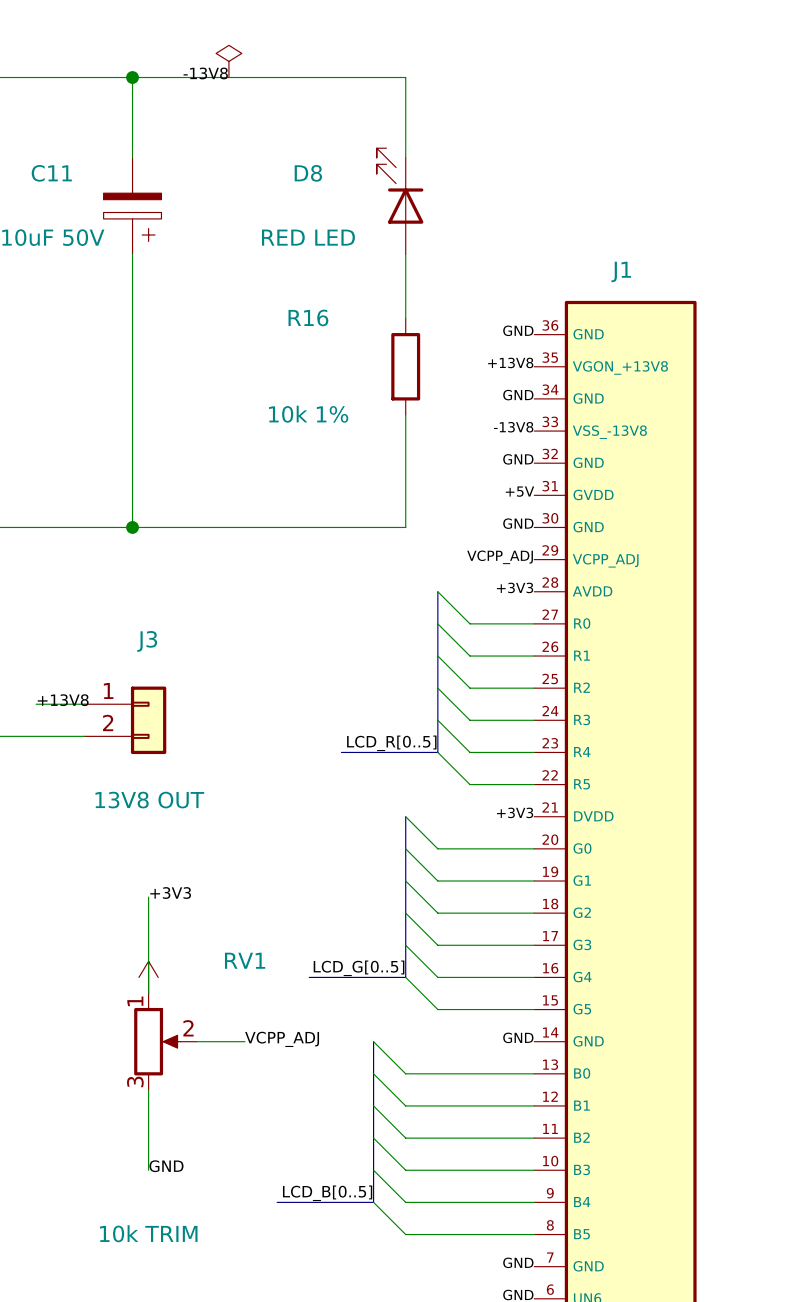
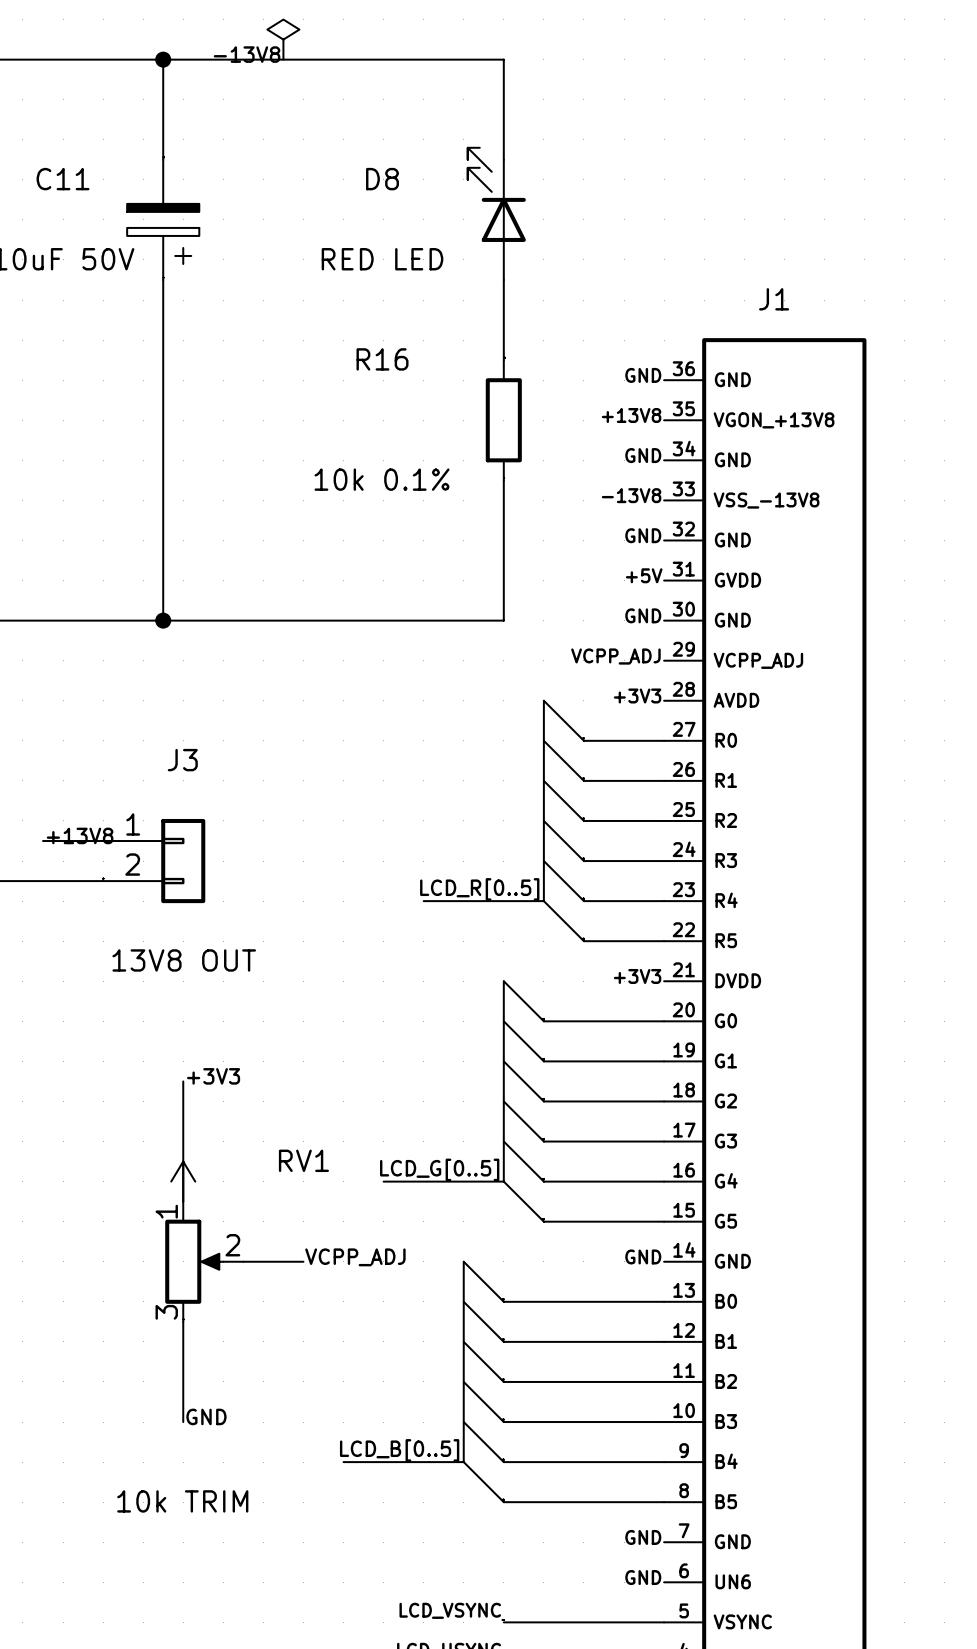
R16 value: 10k 1% (308, 414) -> 10k 0.1% (382, 479)

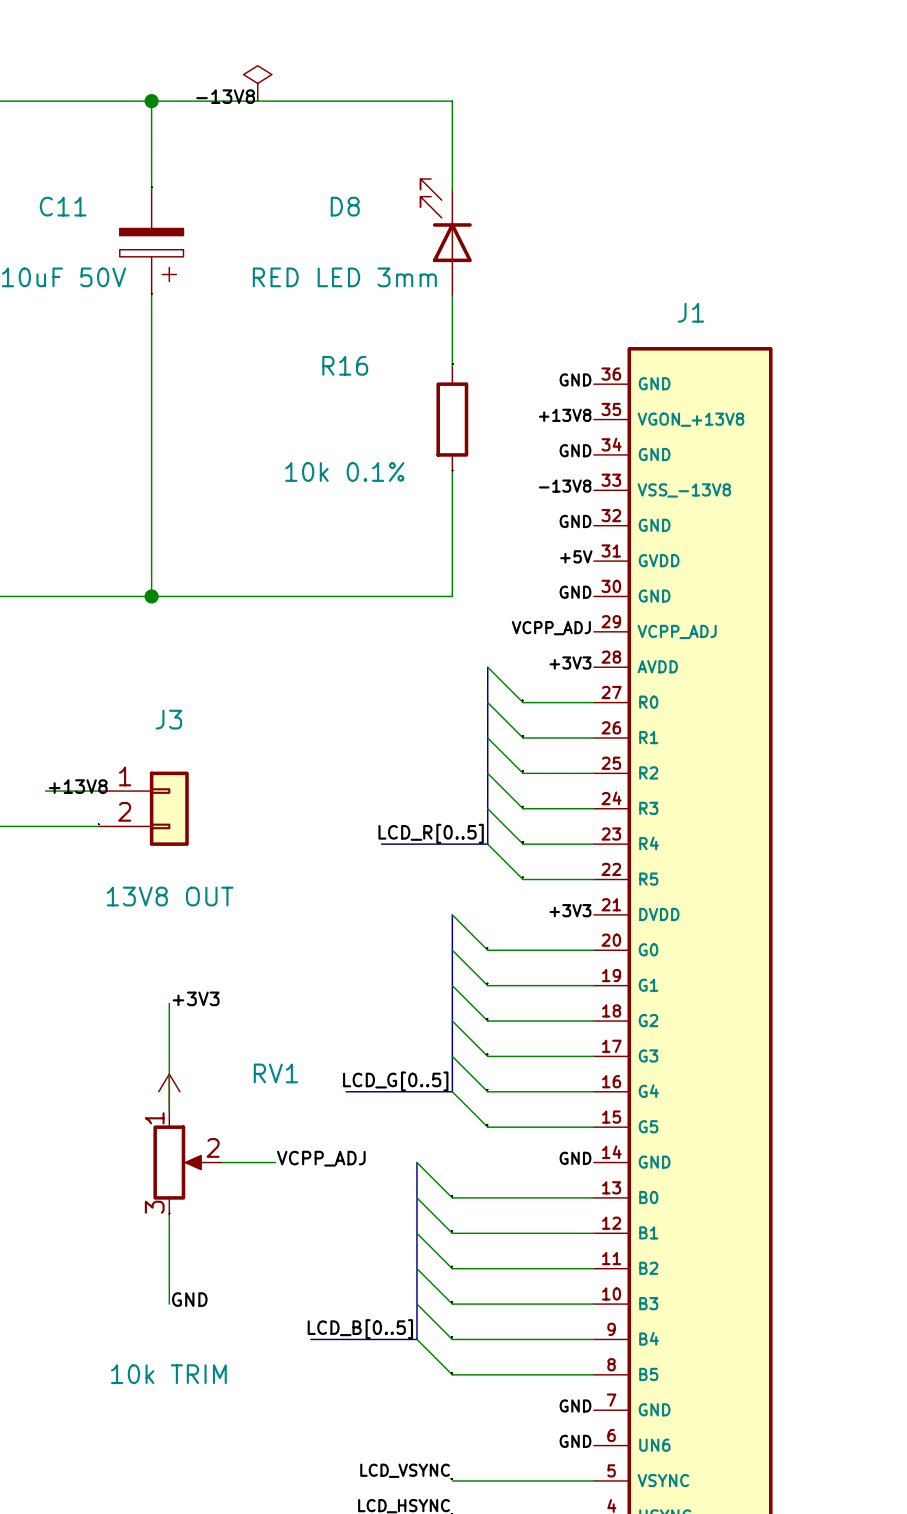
D8 value: RED LED (382, 259) -> RED LED 3mm (344, 277)

